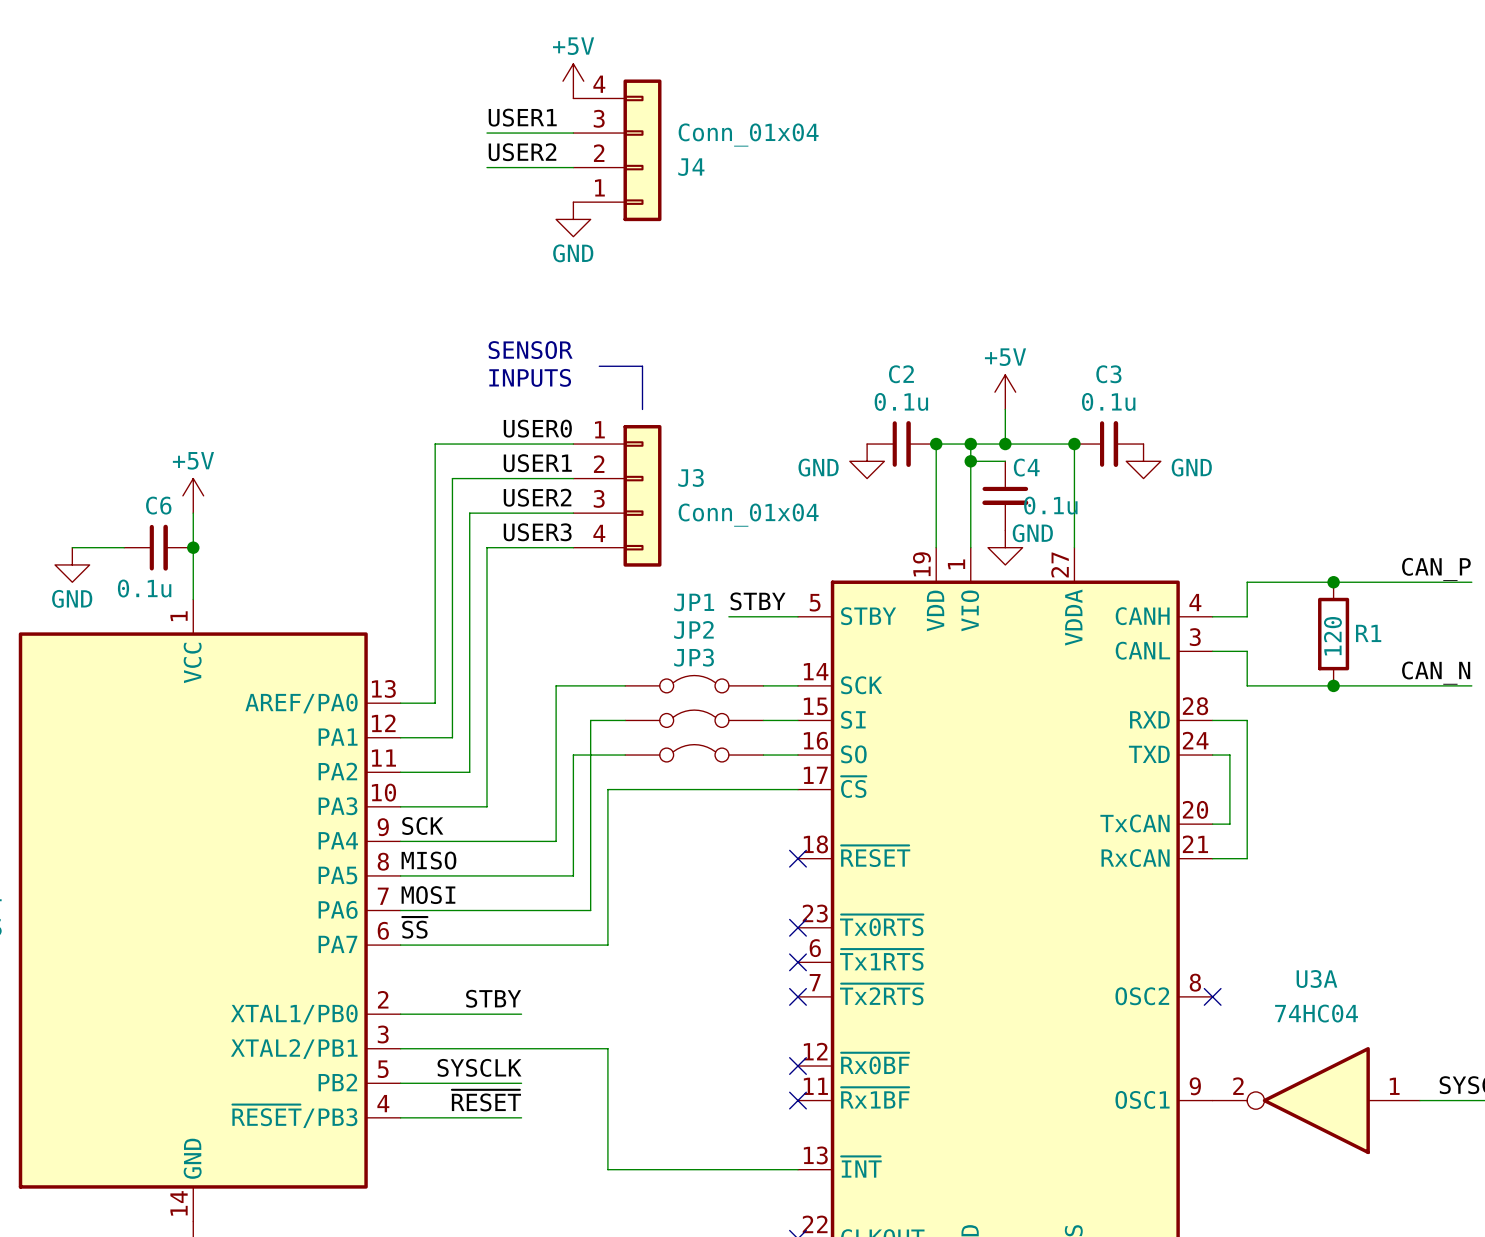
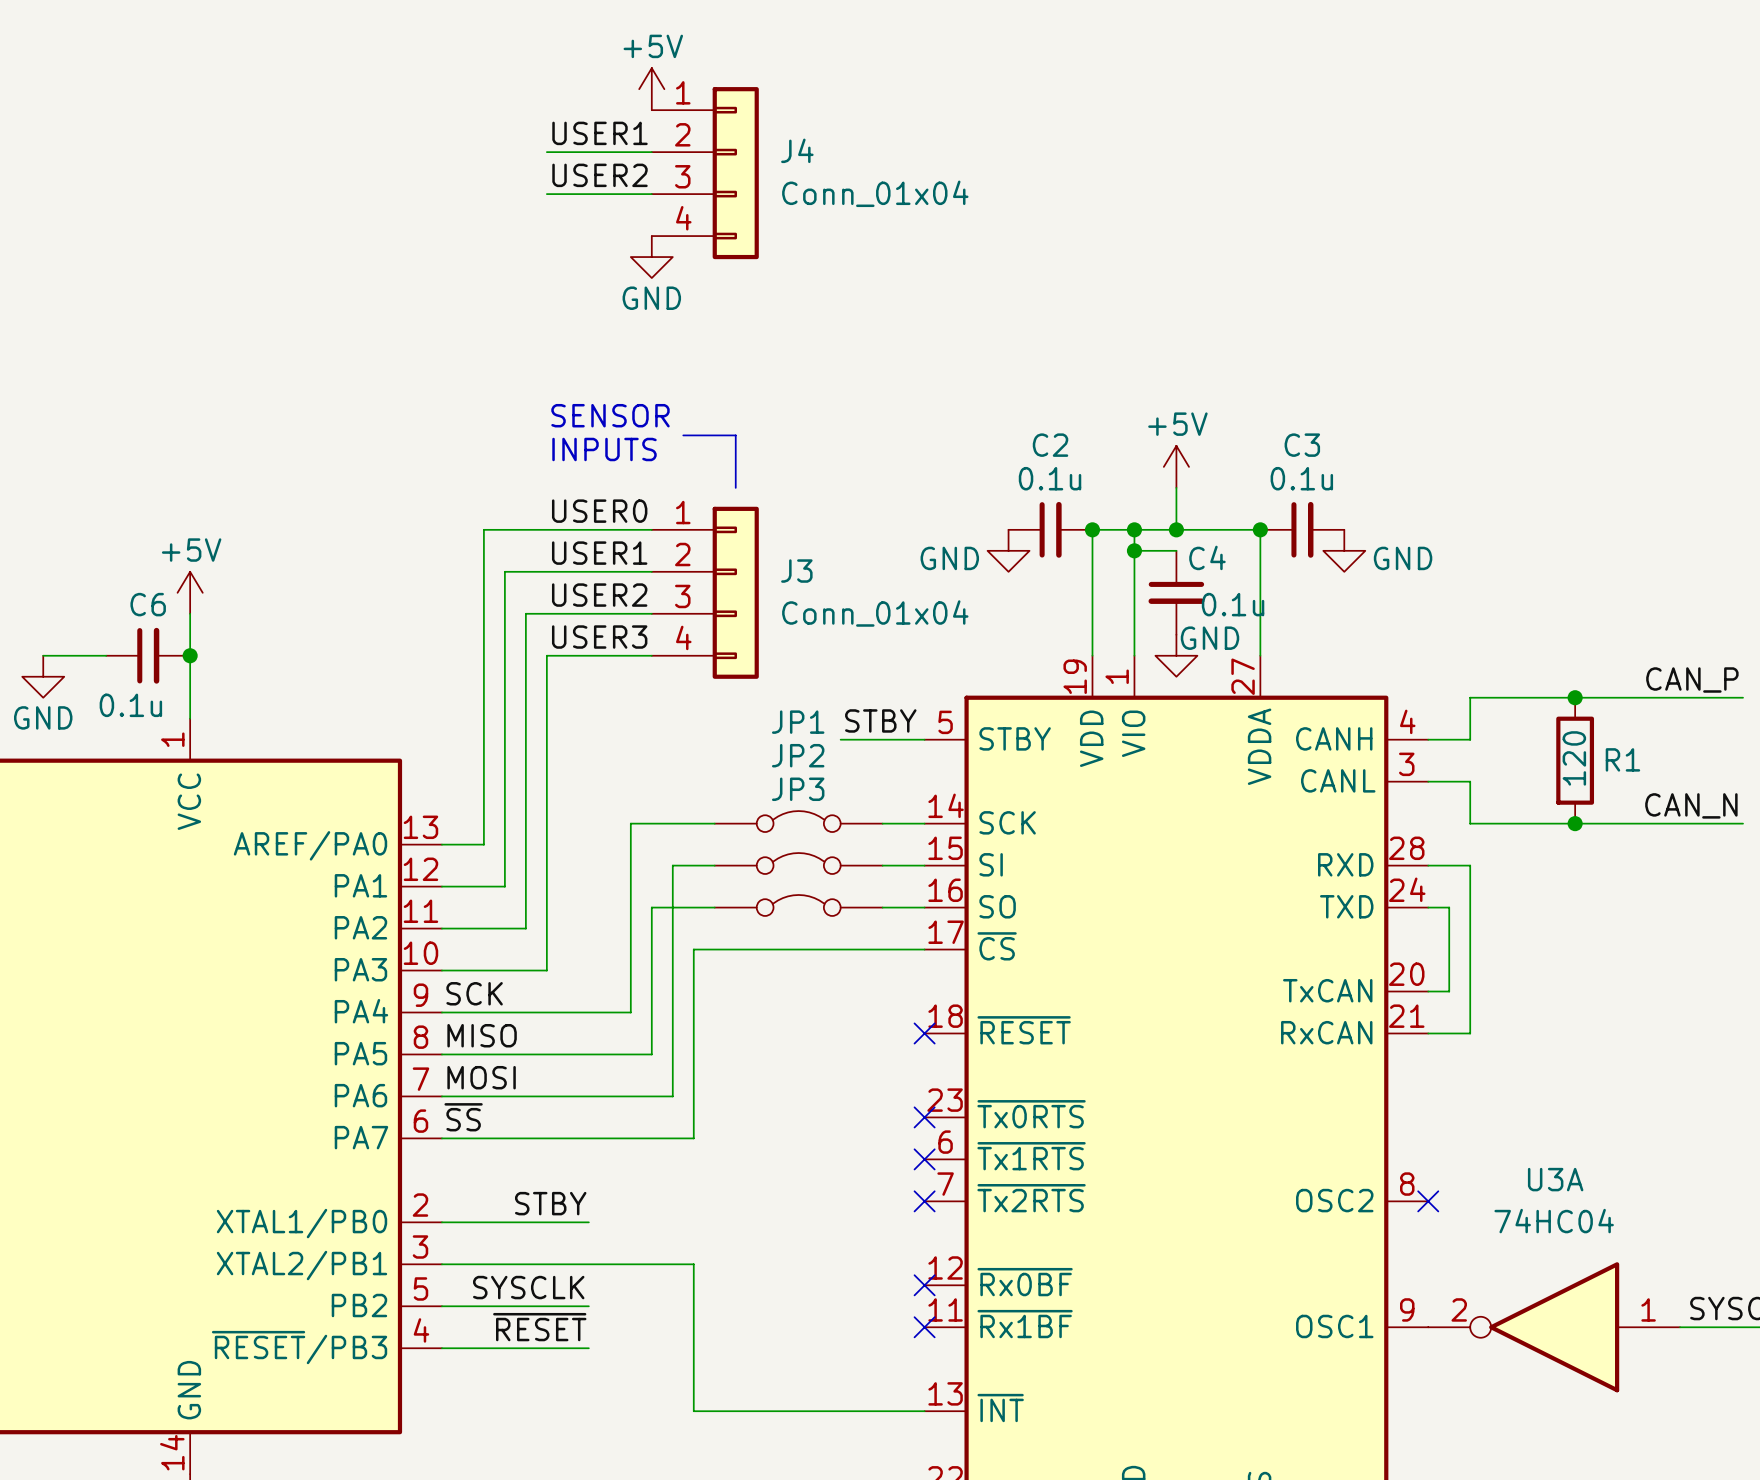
J4 flip: as is (642, 150) -> up-down (735, 173)

